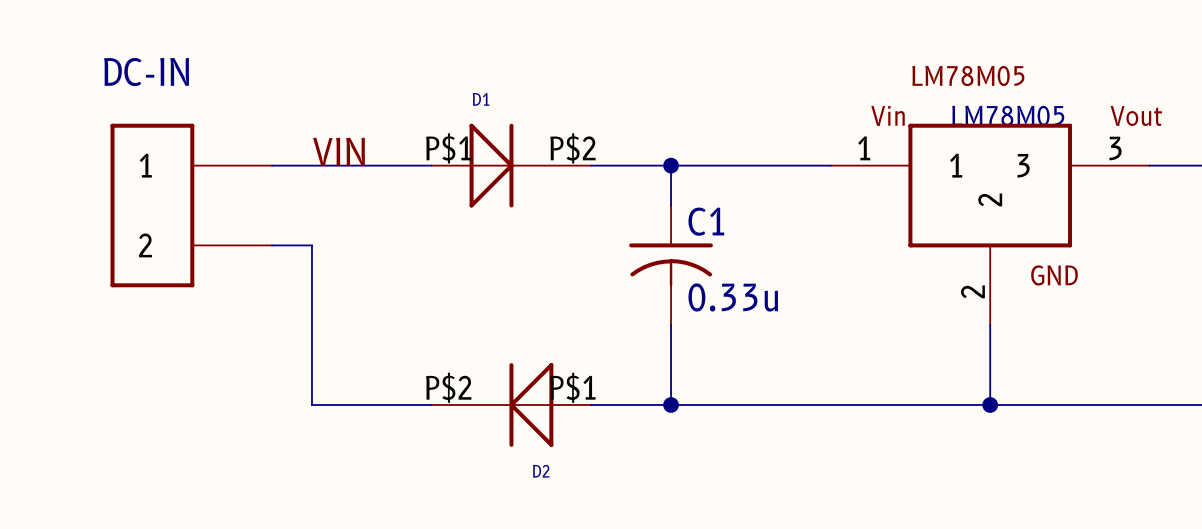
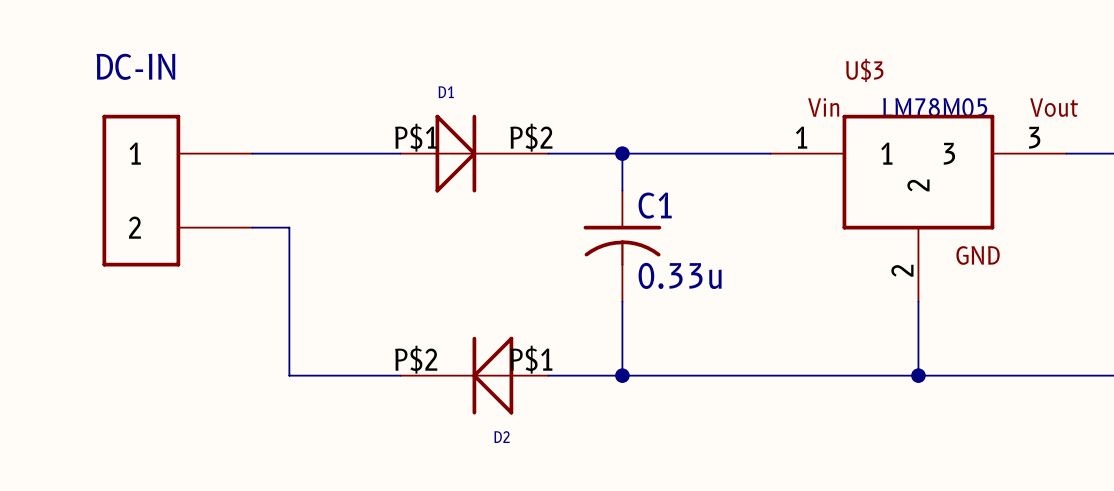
LM78M05 name: LM78M05 (968, 75) -> U$3 (864, 70)
label: VIN (338, 151) -> none

